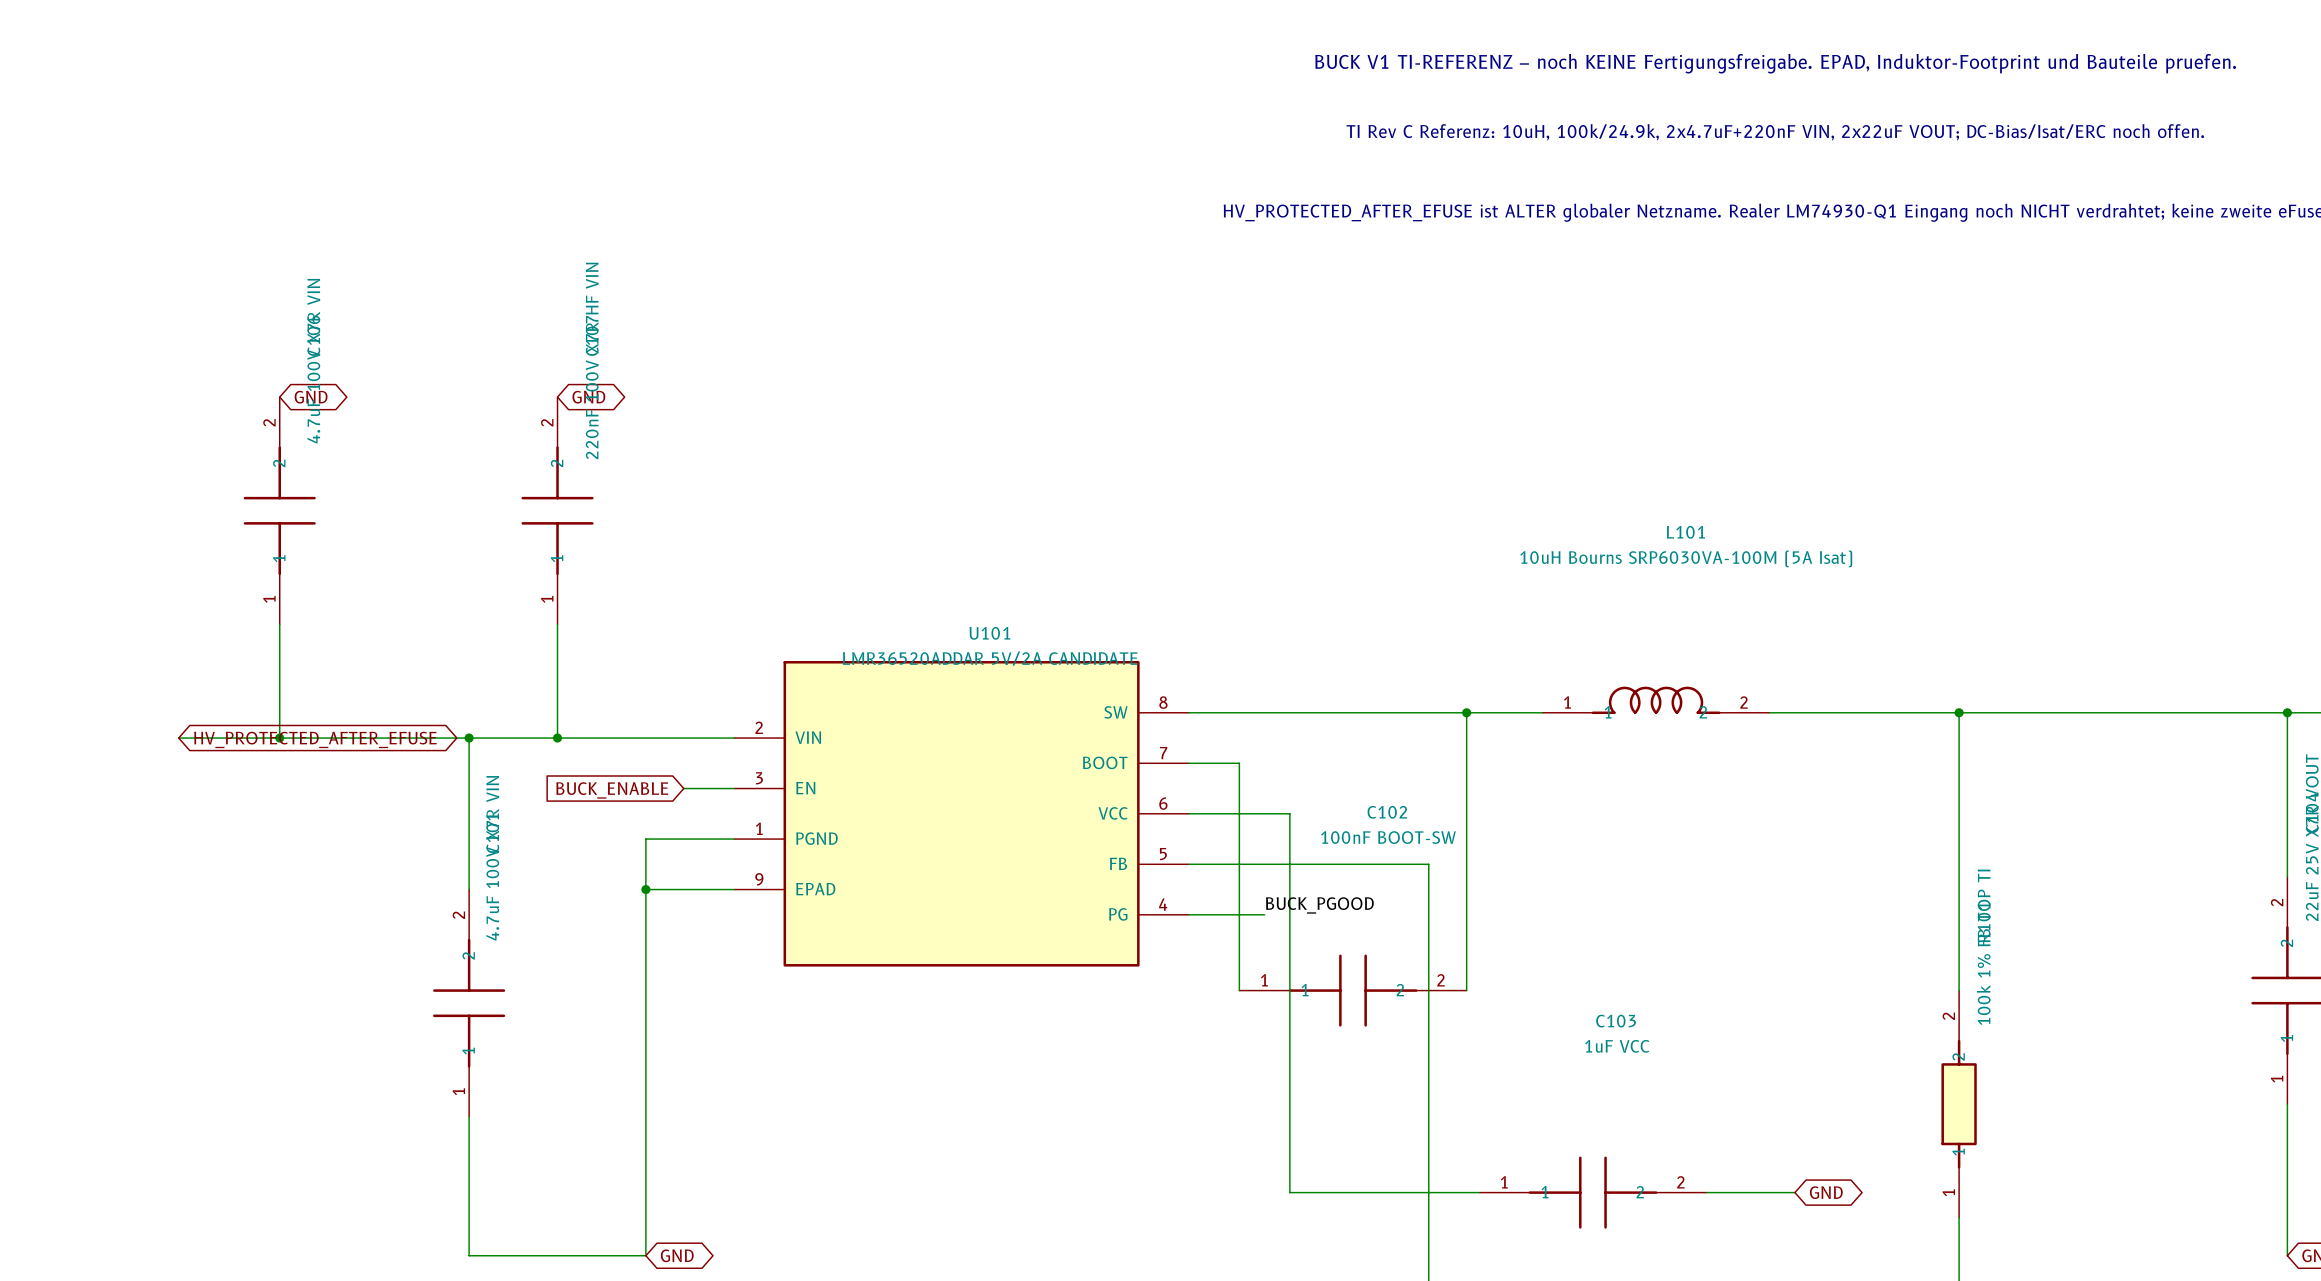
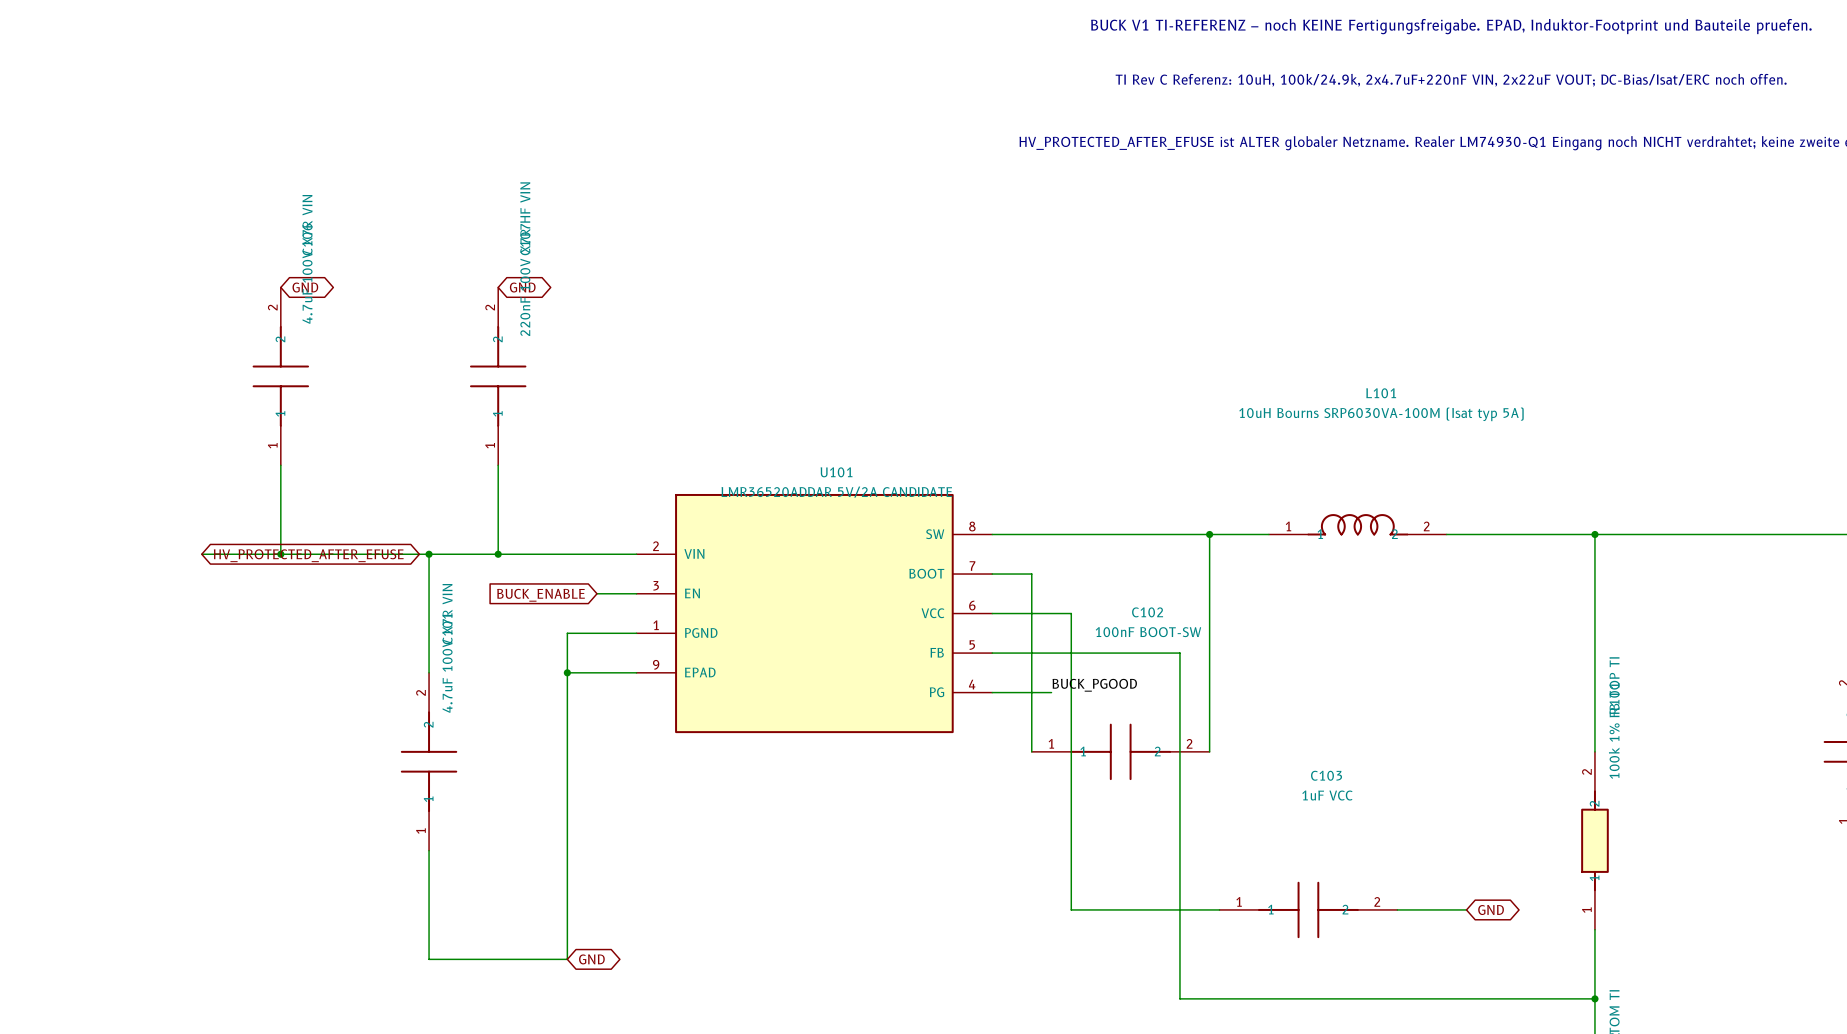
L101 value: 10uH Bourns SRP6030VA-100M (5A Isat) (1686, 558) -> 10uH Bourns SRP6030VA-100M (Isat typ 5A) (1381, 414)

